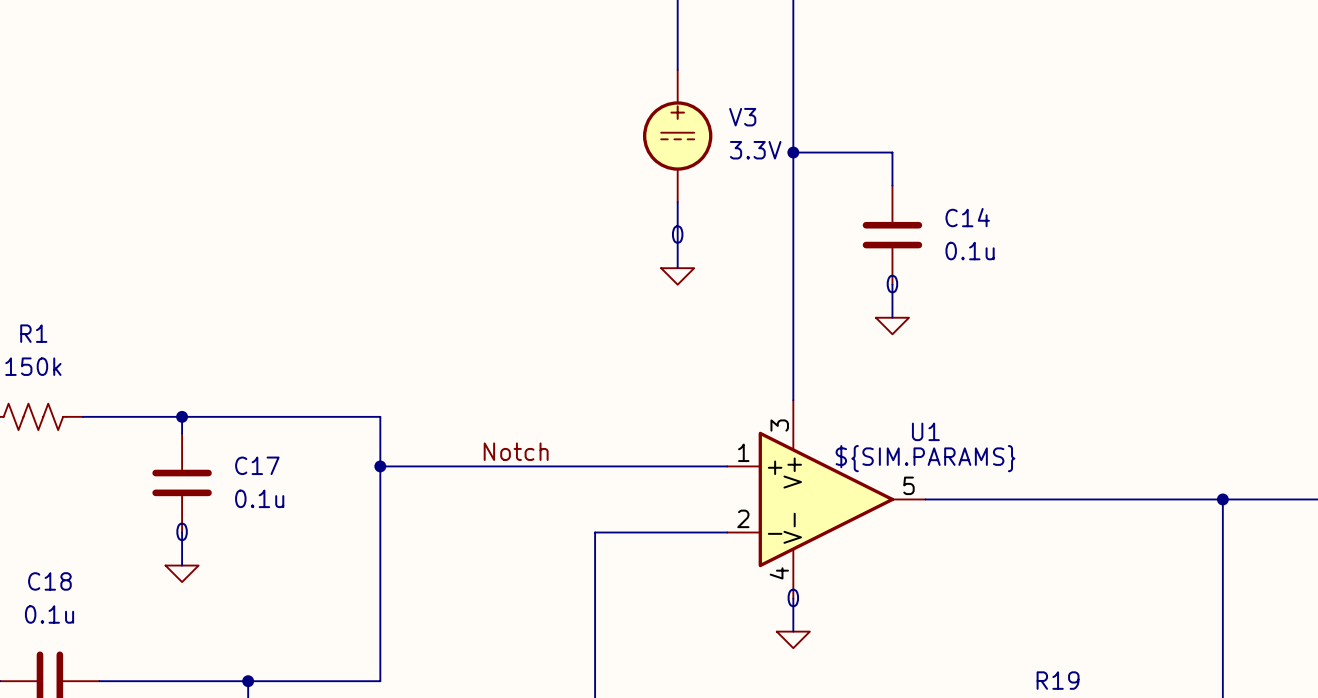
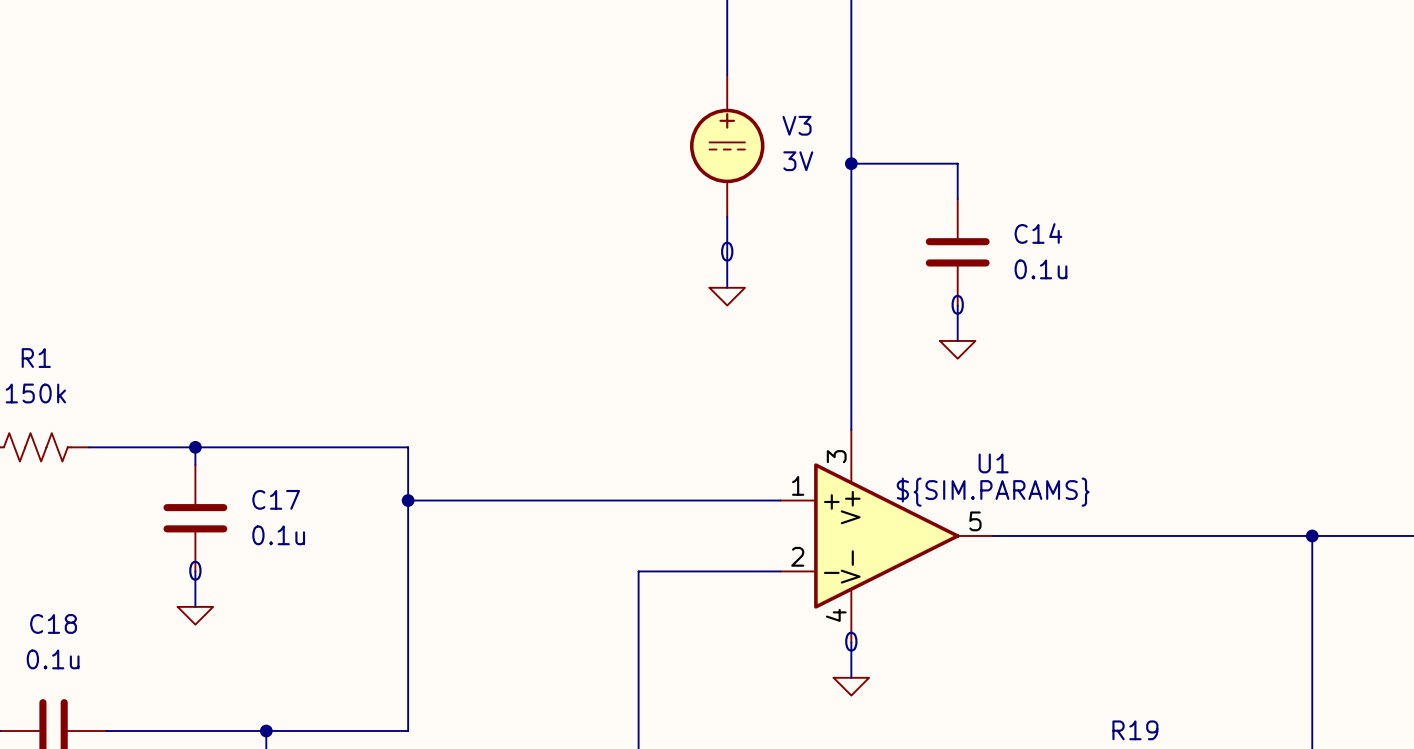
V3 value: 3.3V (755, 150) -> 3V (798, 161)
label: Notch (516, 451) -> none

